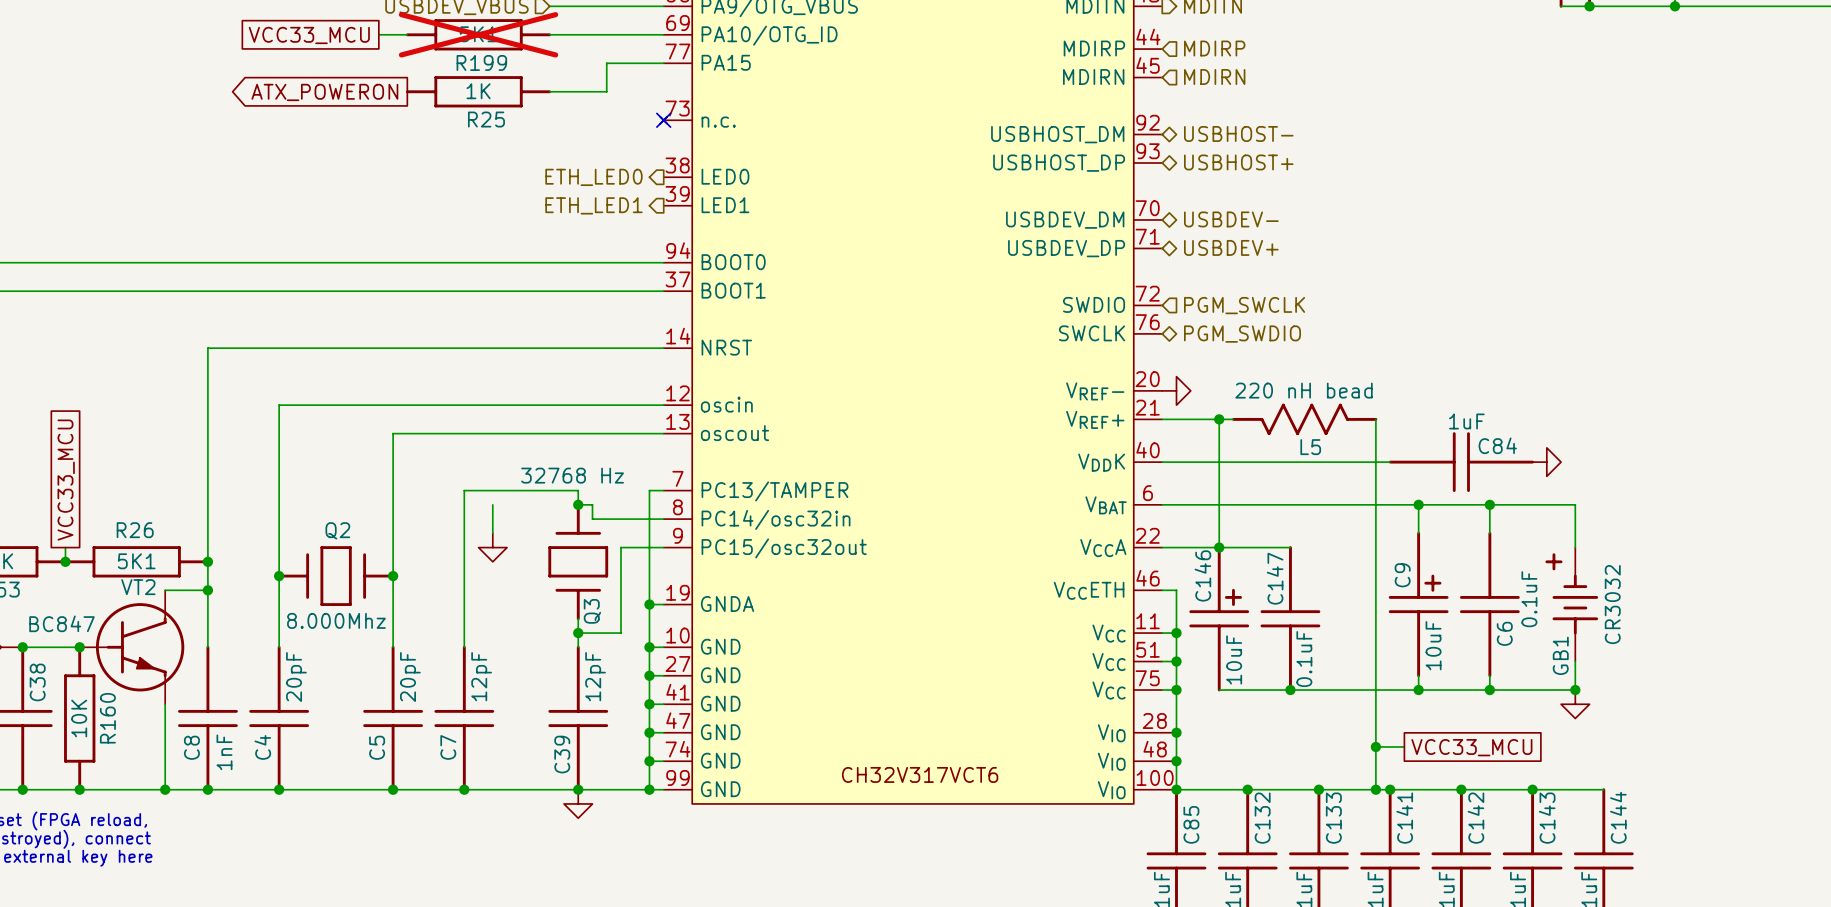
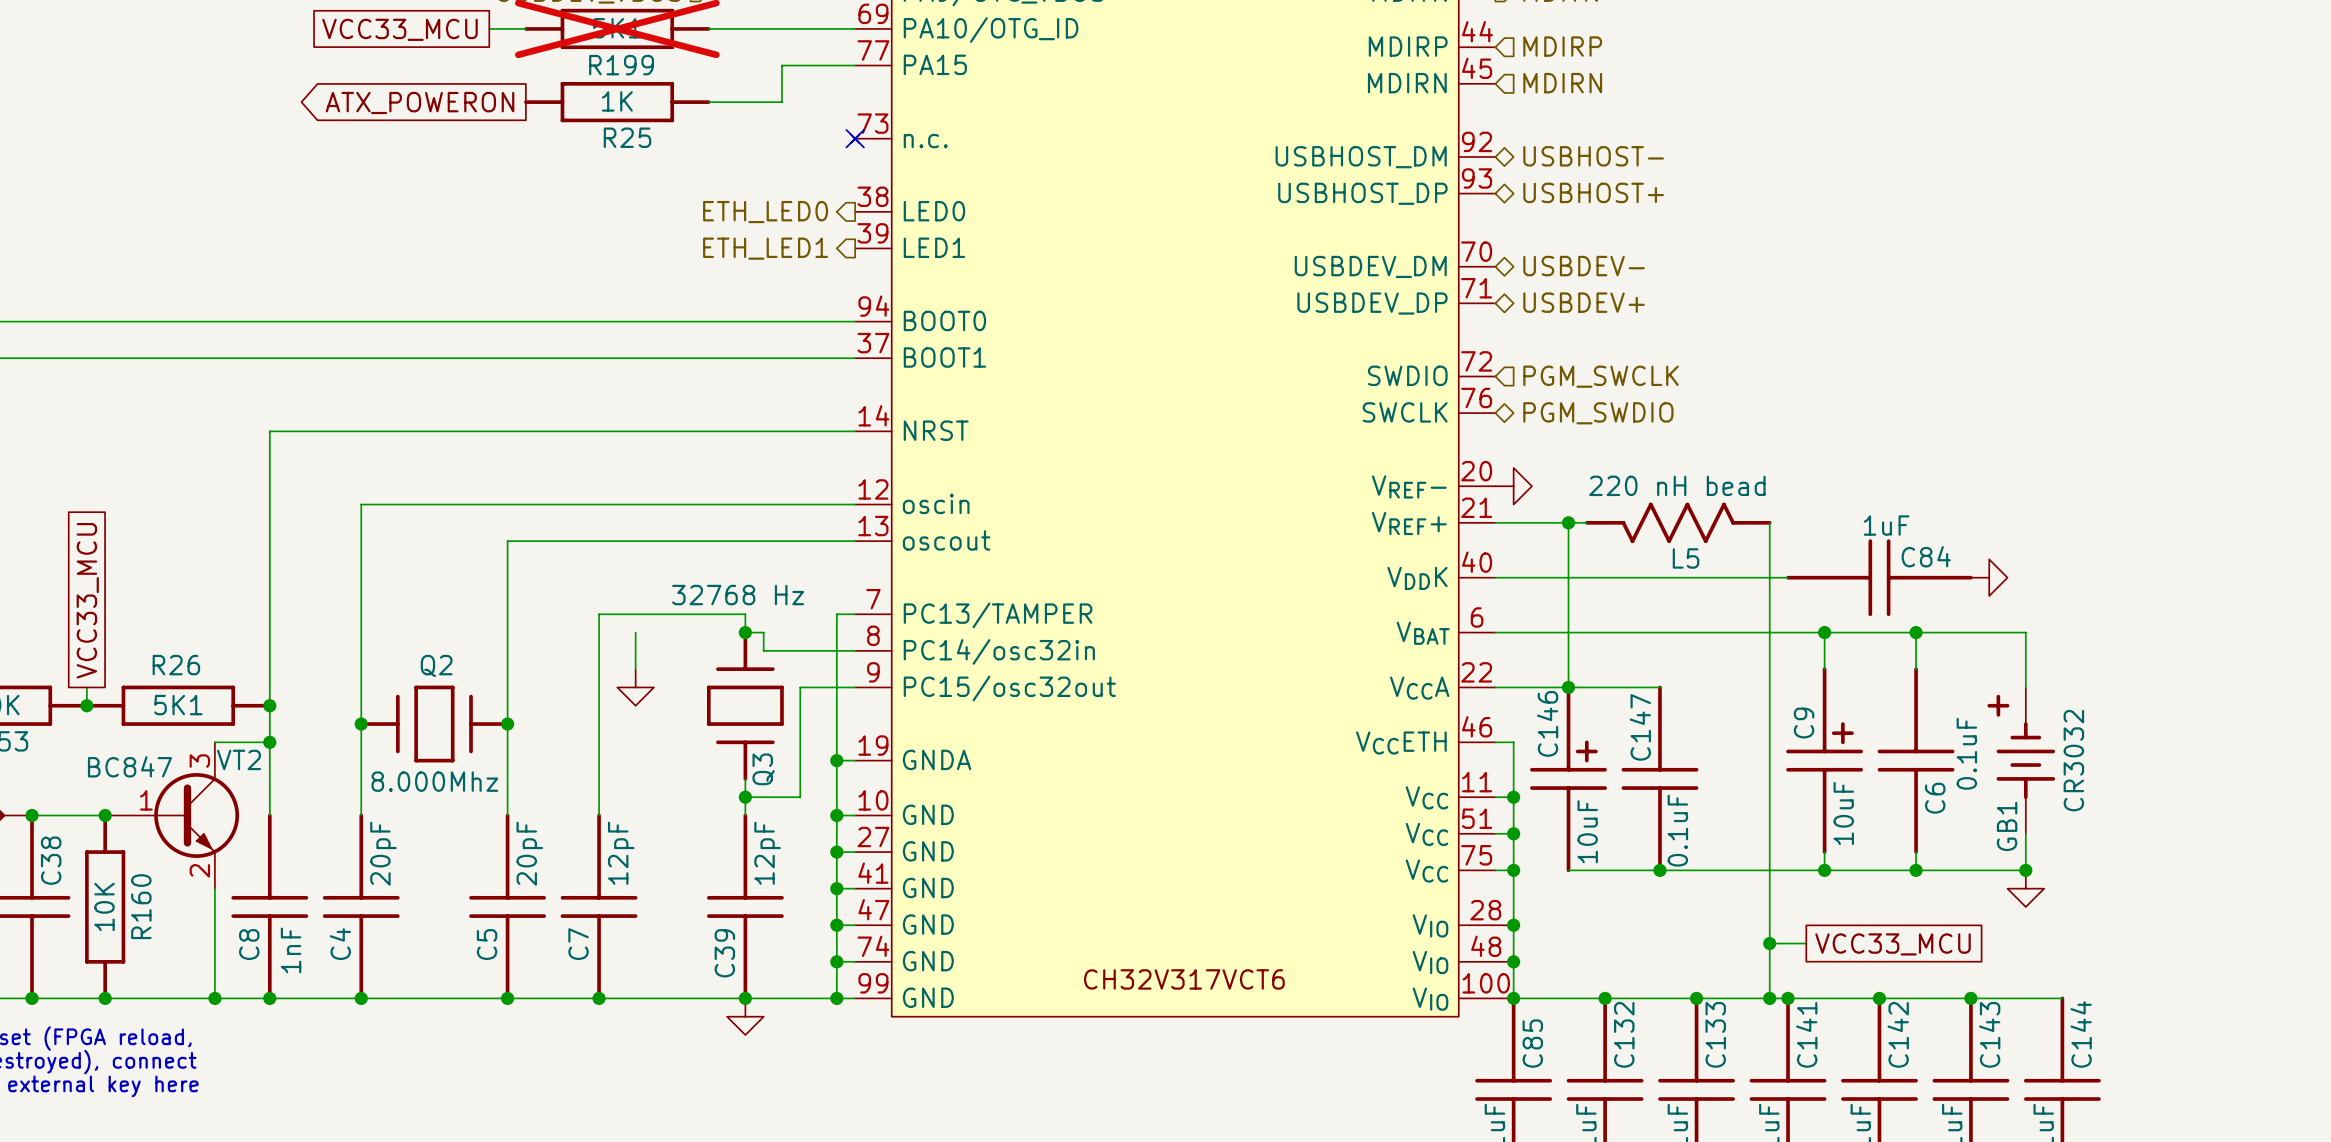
VT2 name position: VT2 (138, 587) -> VT2 (239, 759)
VT2 symbol: [79, 590, 185, 705] -> [105, 742, 240, 889]
VT2 value position: BC847 (61, 623) -> BC847 (129, 766)

